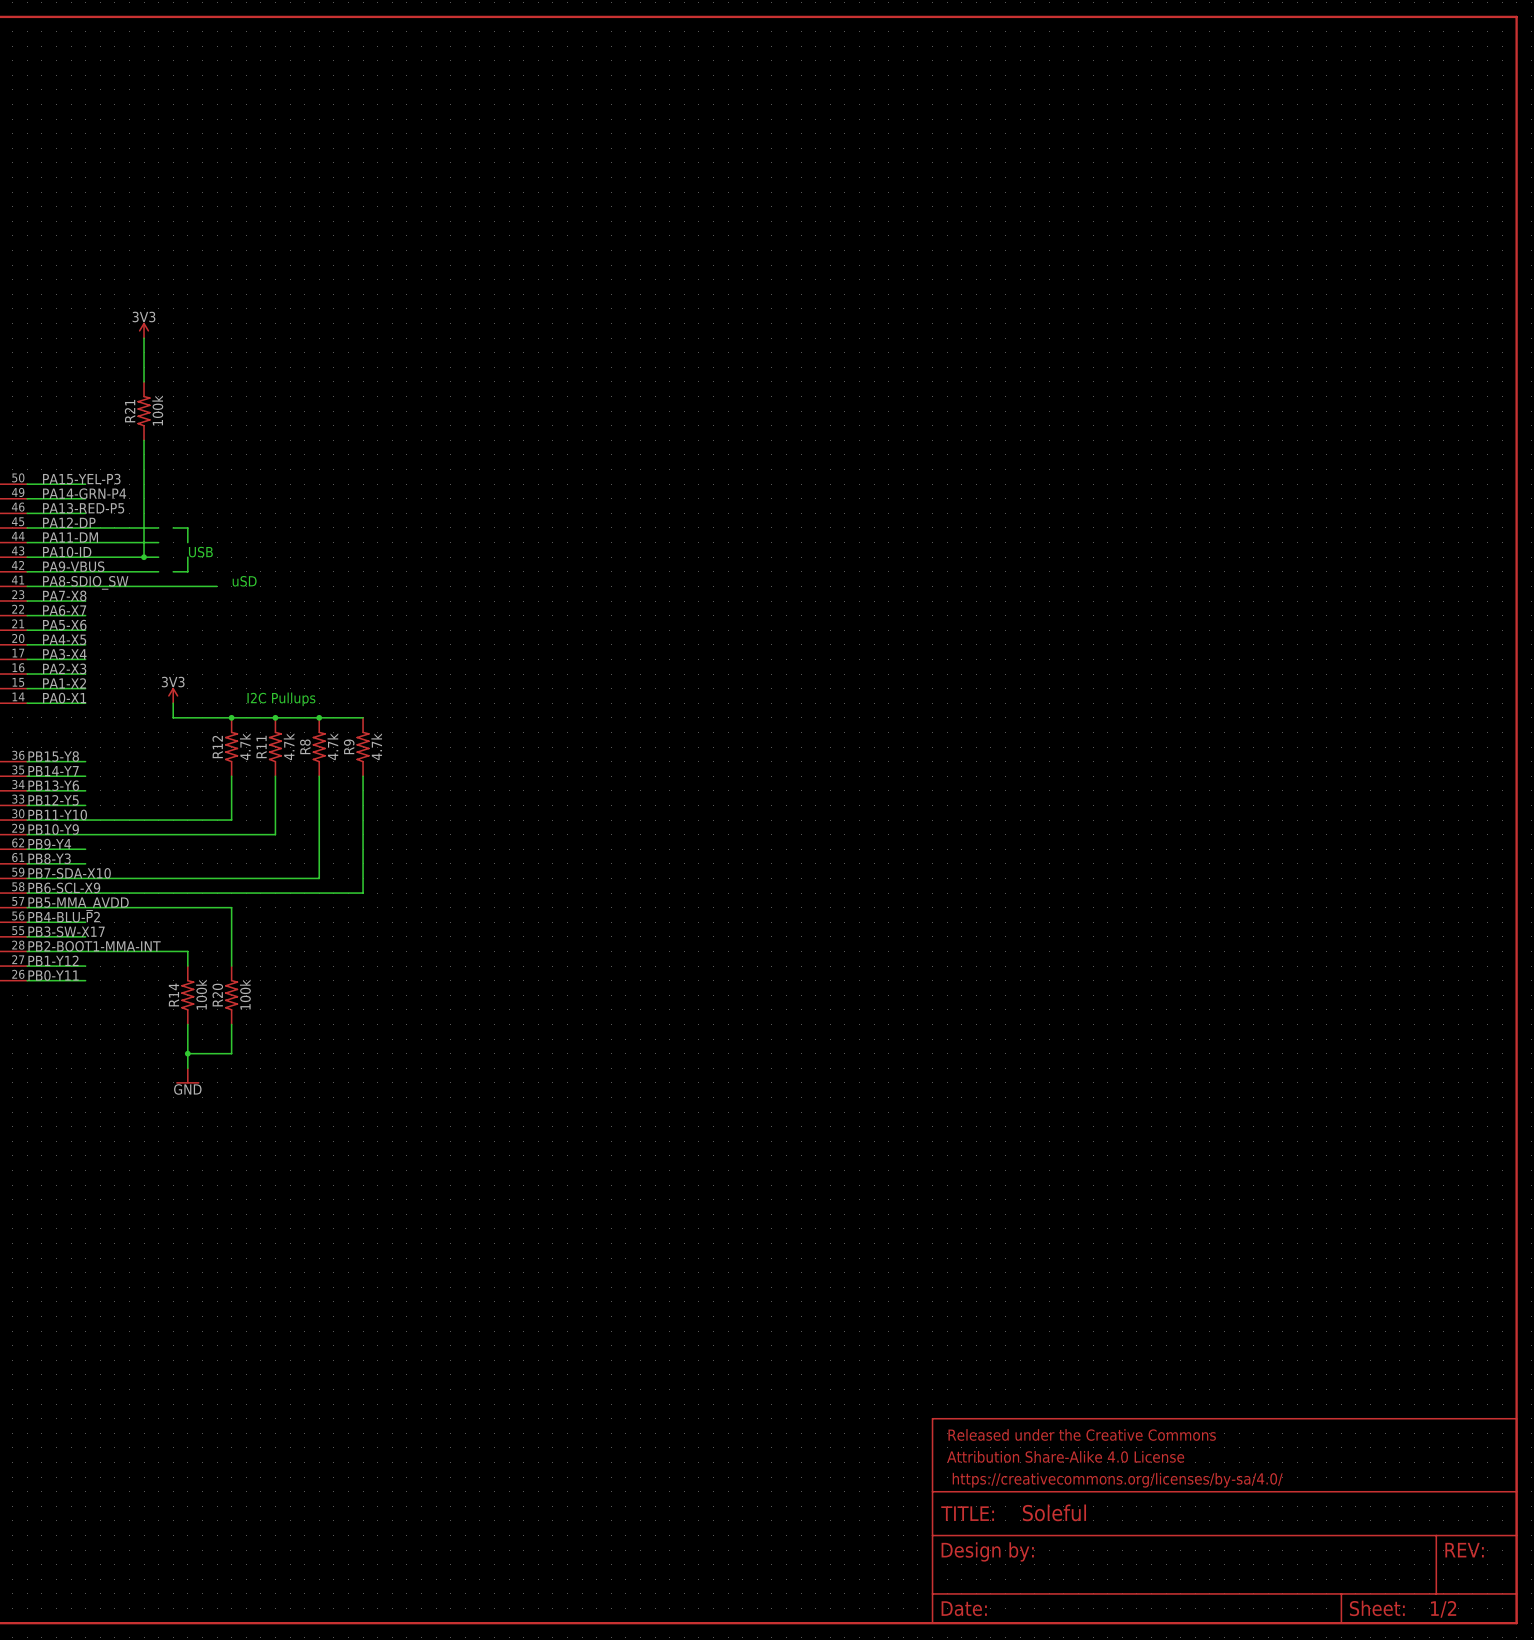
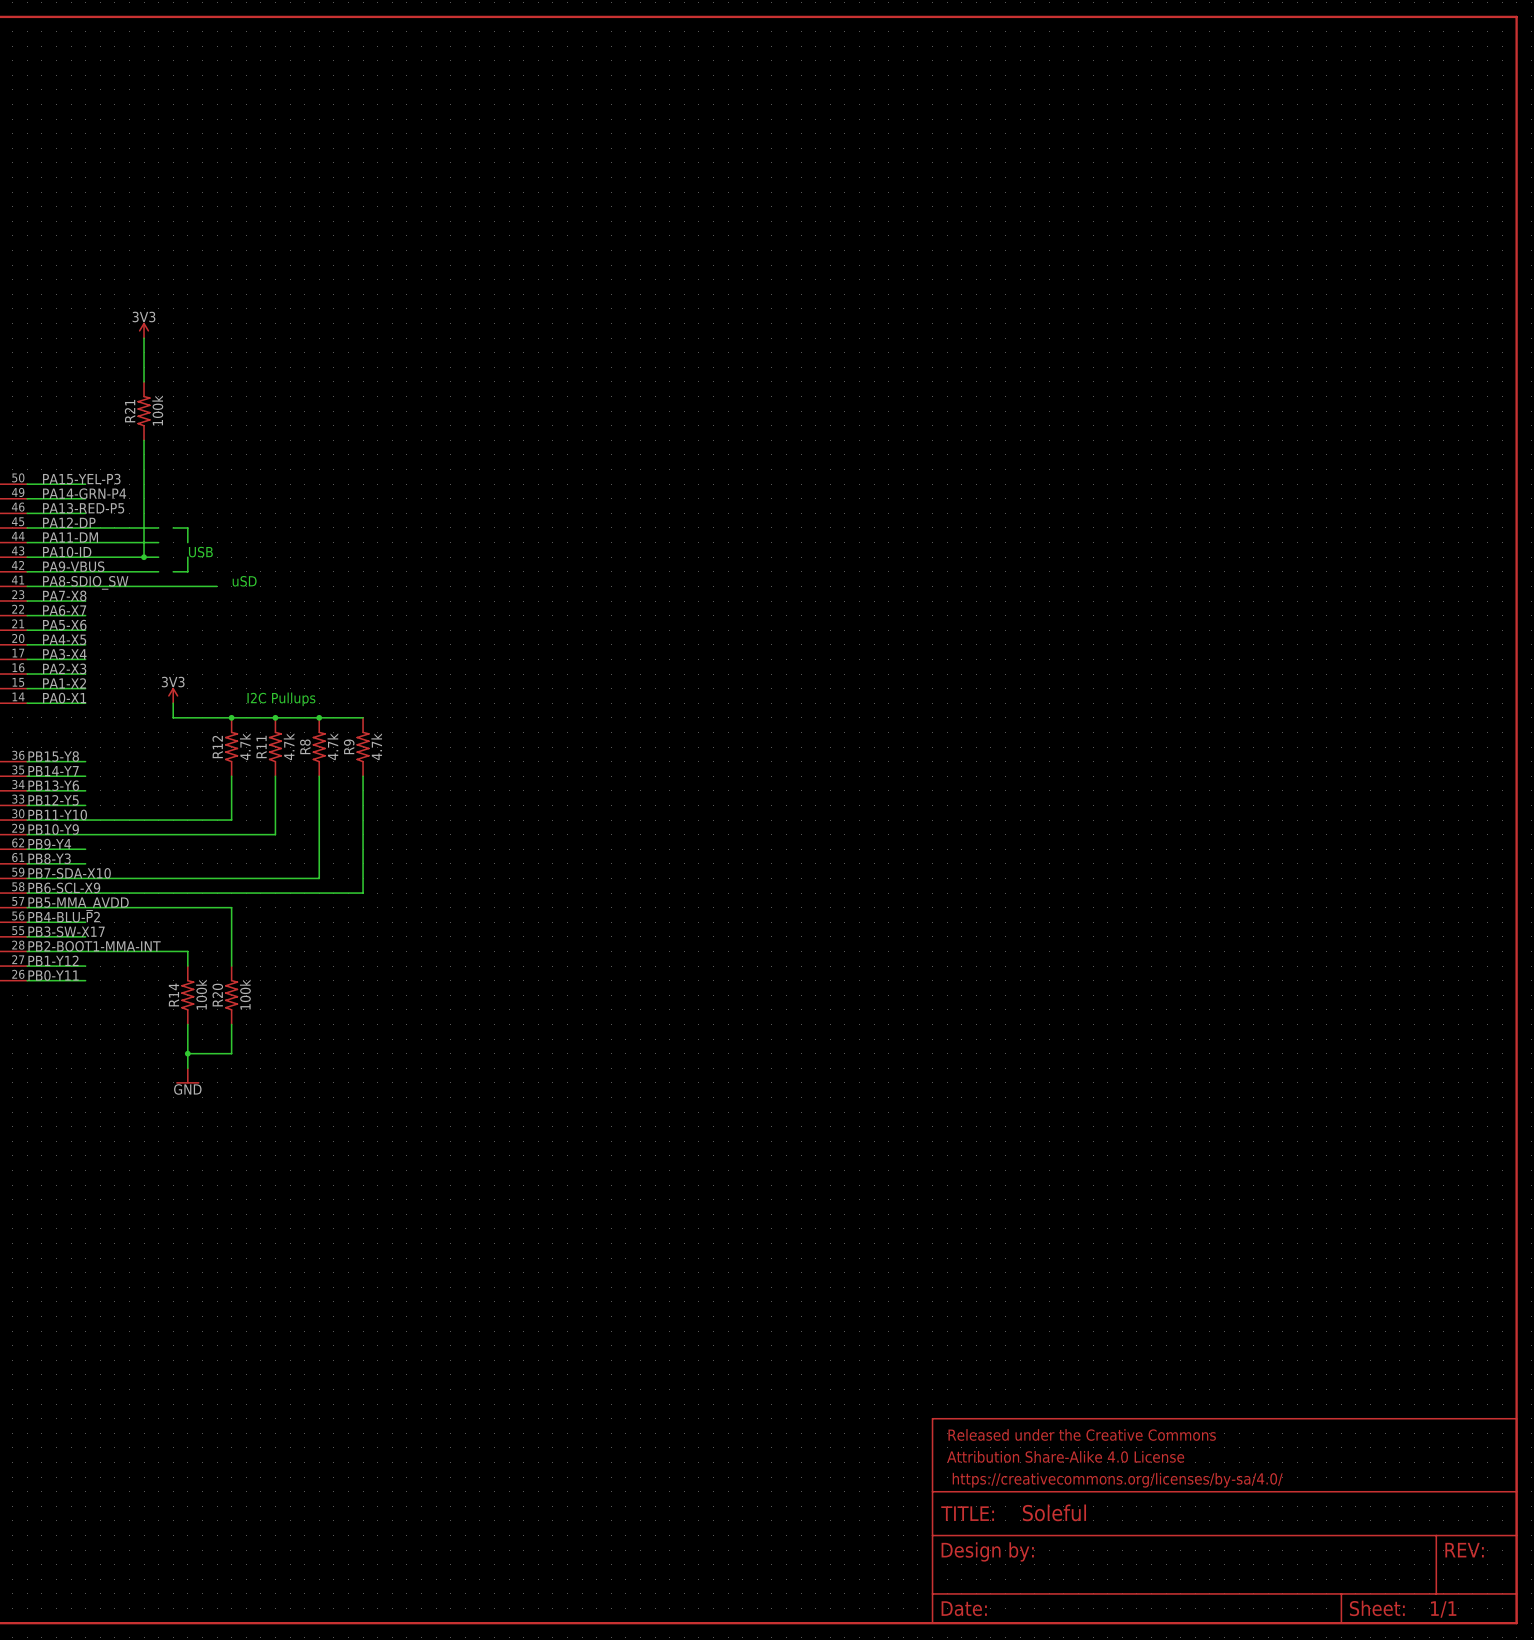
part text: 1/2 (1443, 1609) -> 1/1 (1443, 1609)

